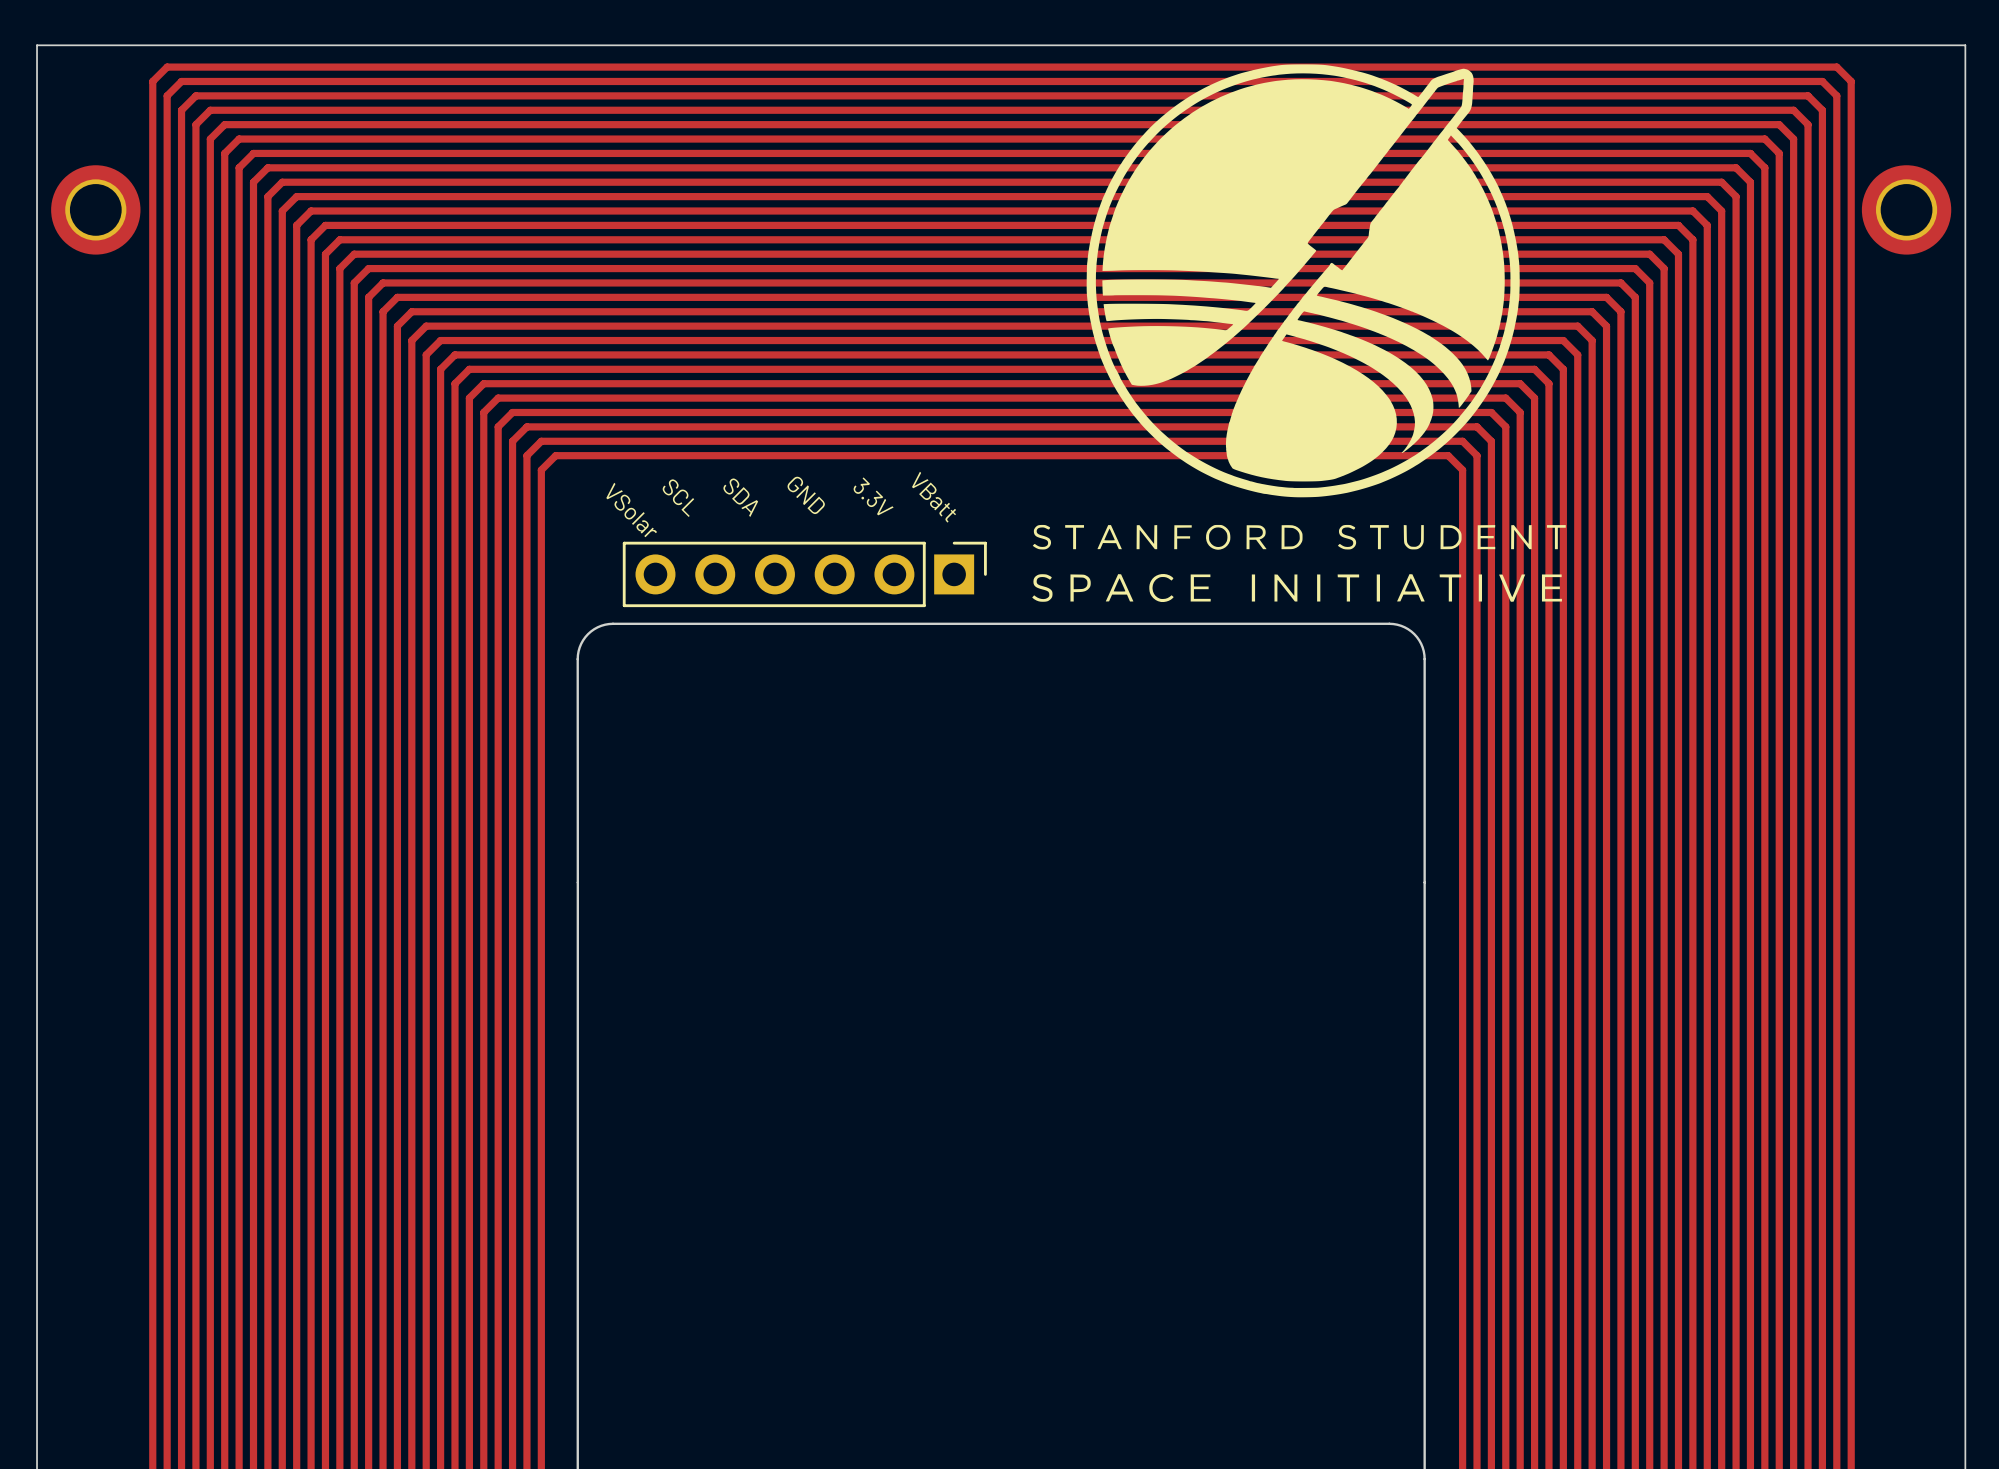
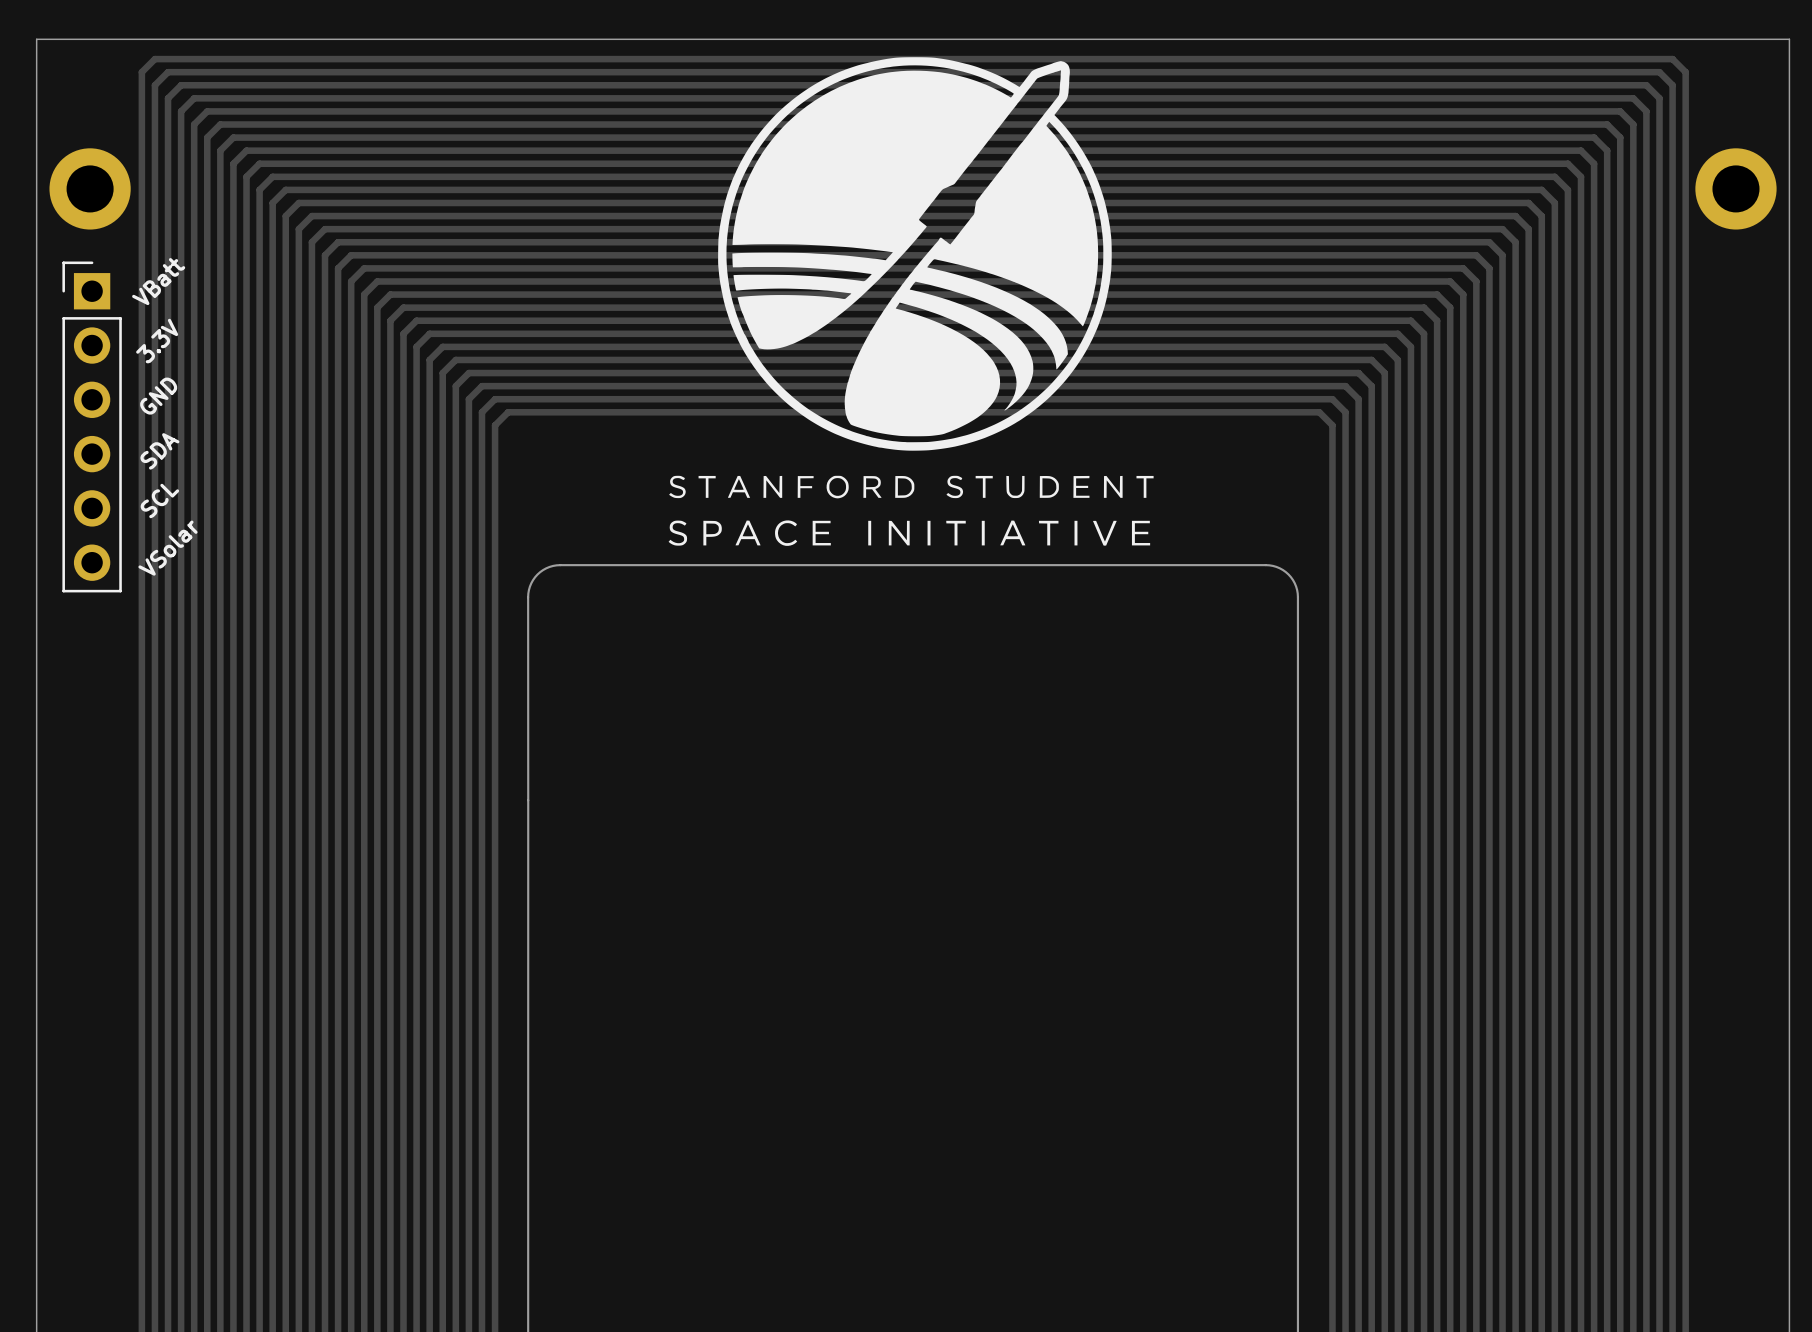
text: none -> VBatt (158, 281)
drawing position: (1298, 333) -> (911, 301)
text: none -> 3.3V (157, 341)
text: none -> GND (158, 396)
part: none -> (92, 426)
text: GND (806, 495) -> none
text: 3.3V (873, 496) -> none
text rotation: 0° (740, 497) -> 90° counterclockwise (159, 451)
text position: SDA (740, 497) -> SDA (159, 451)
text: VBatt (934, 497) -> none
text rotation: 0° (678, 498) -> 90° counterclockwise (159, 501)
text position: SCL (678, 498) -> SCL (159, 501)
text rotation: 0° (631, 510) -> 90° counterclockwise (168, 548)
text position: VSolar (631, 510) -> VSolar (168, 548)
part: (804, 574) -> none

